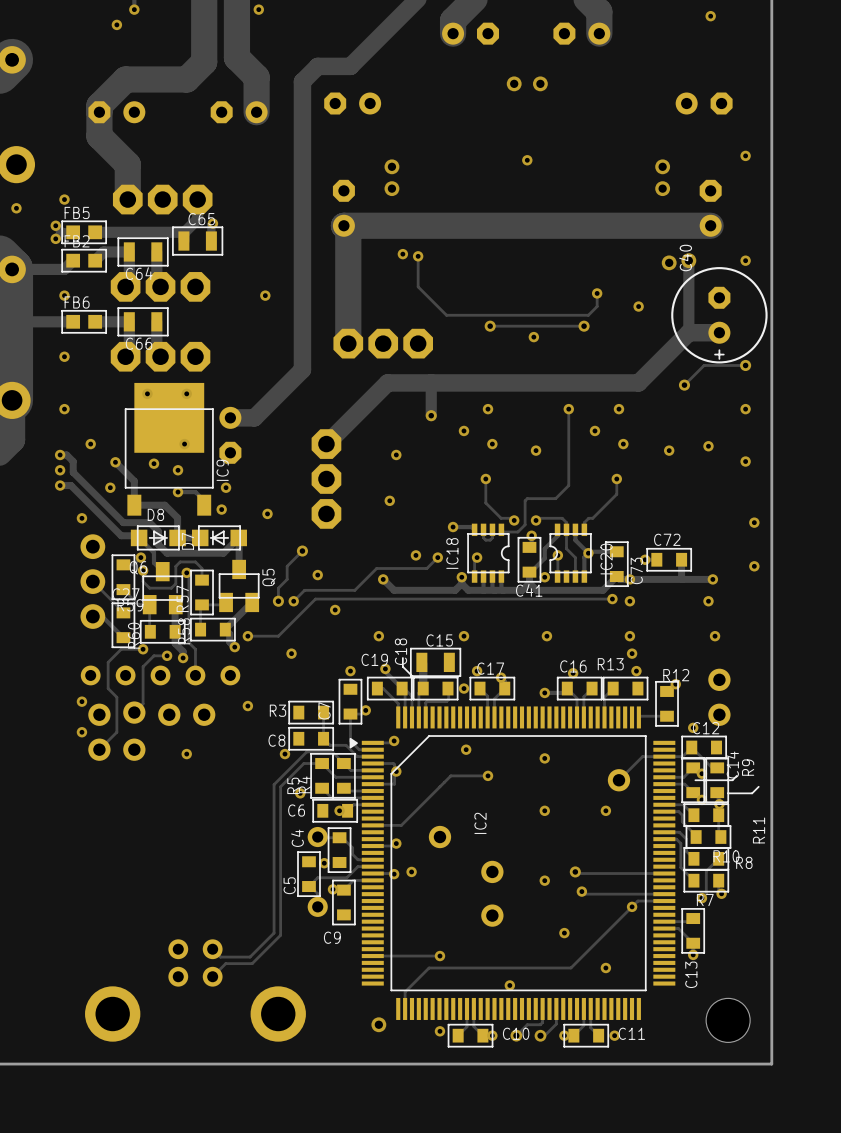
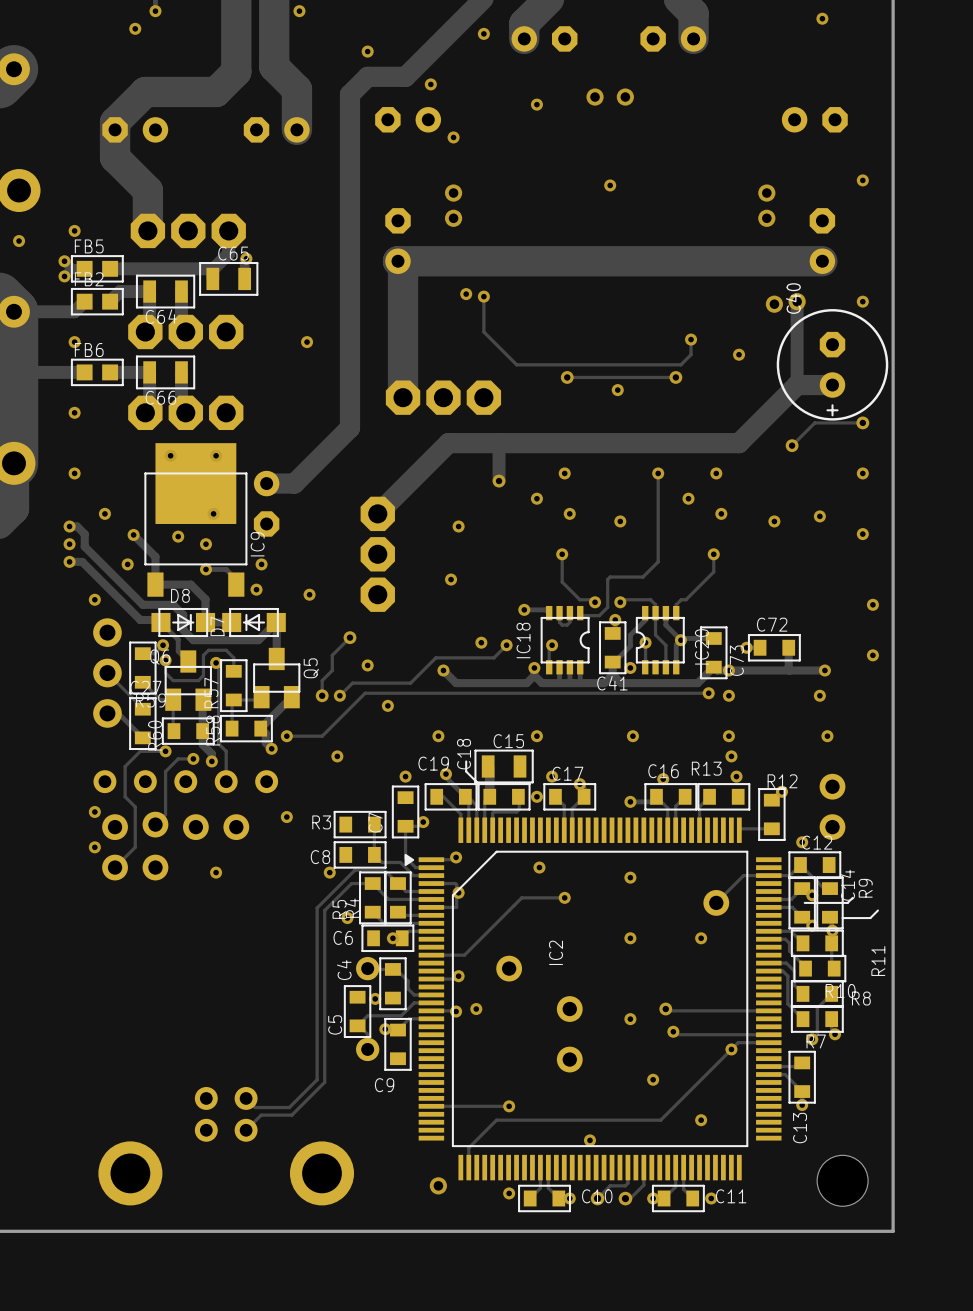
via: none -> (483, 33)
via: none -> (367, 51)
via: none -> (430, 84)
via: none -> (536, 104)
via: none -> (453, 137)

